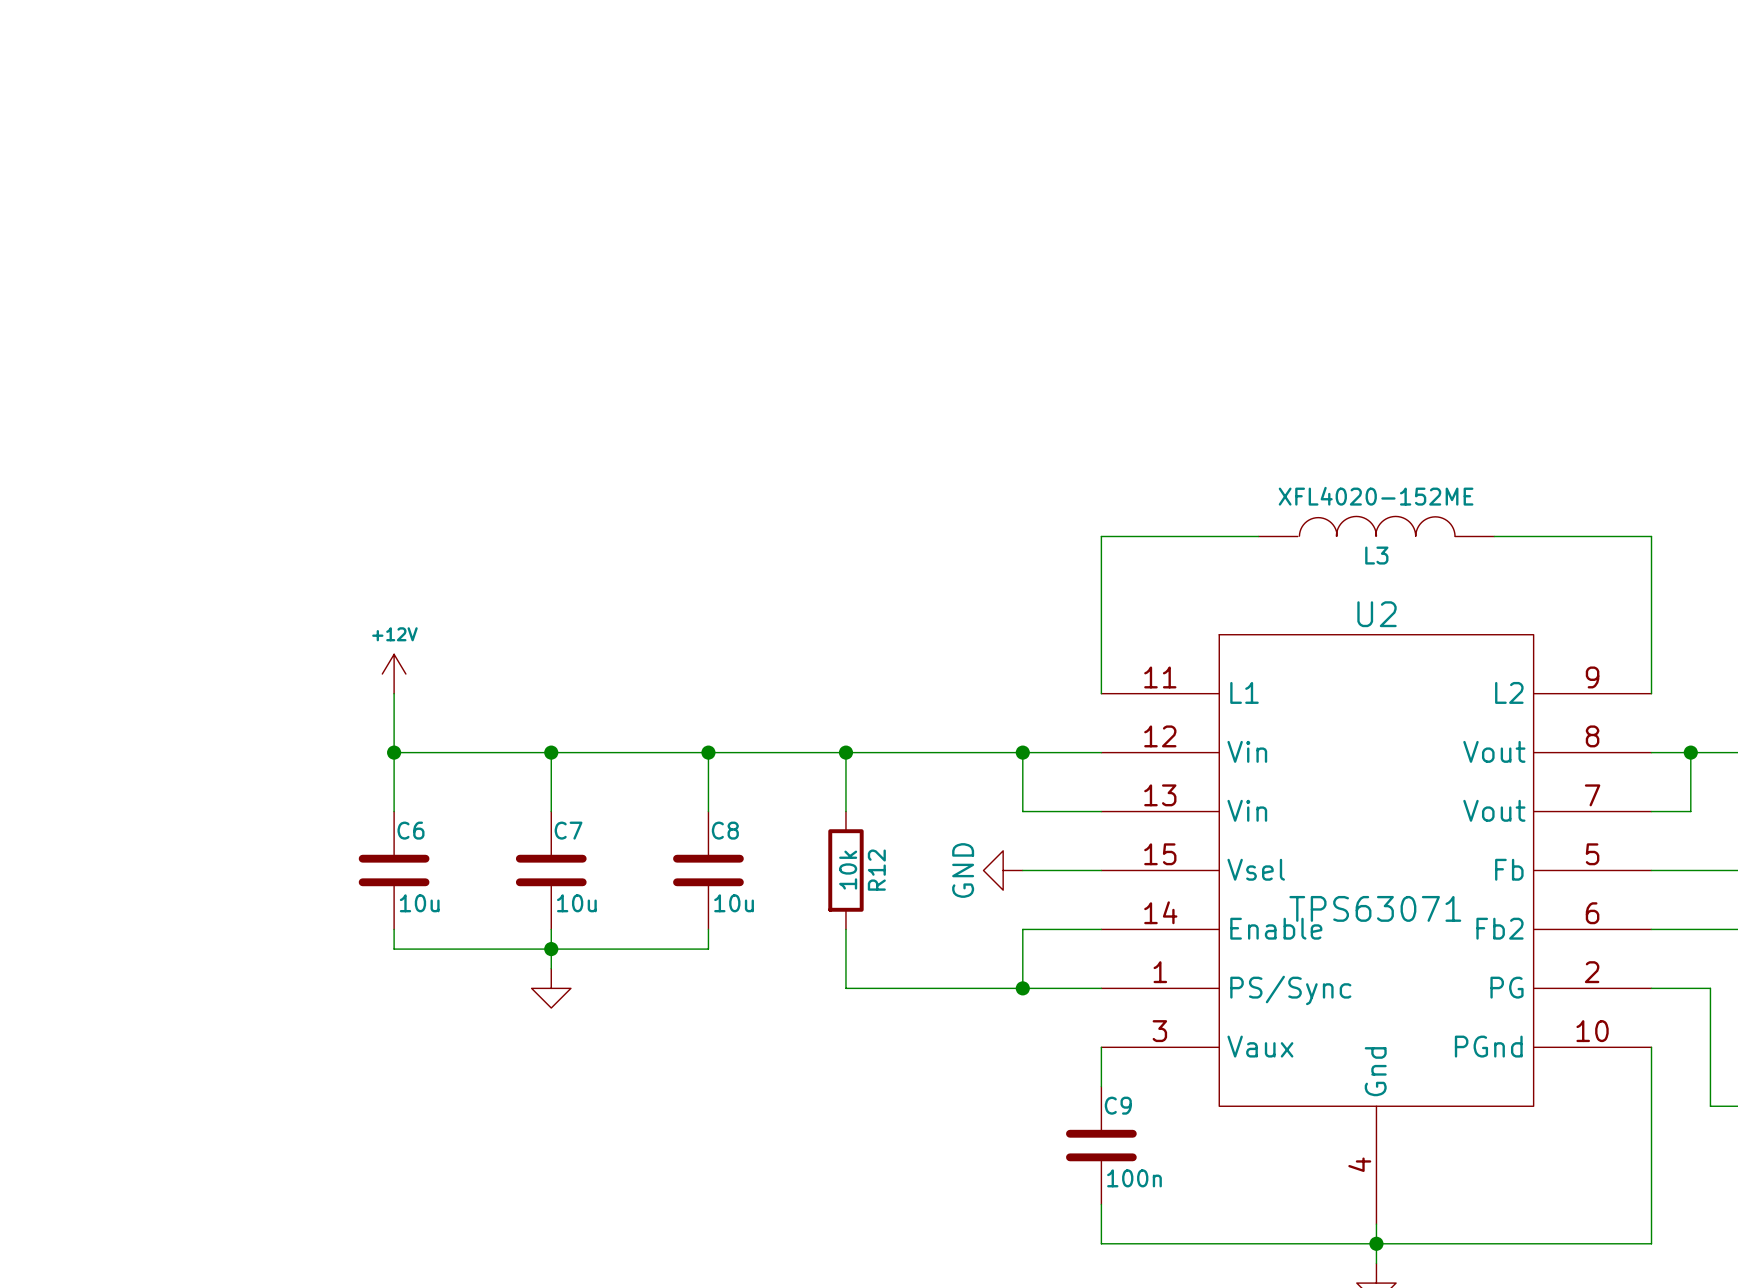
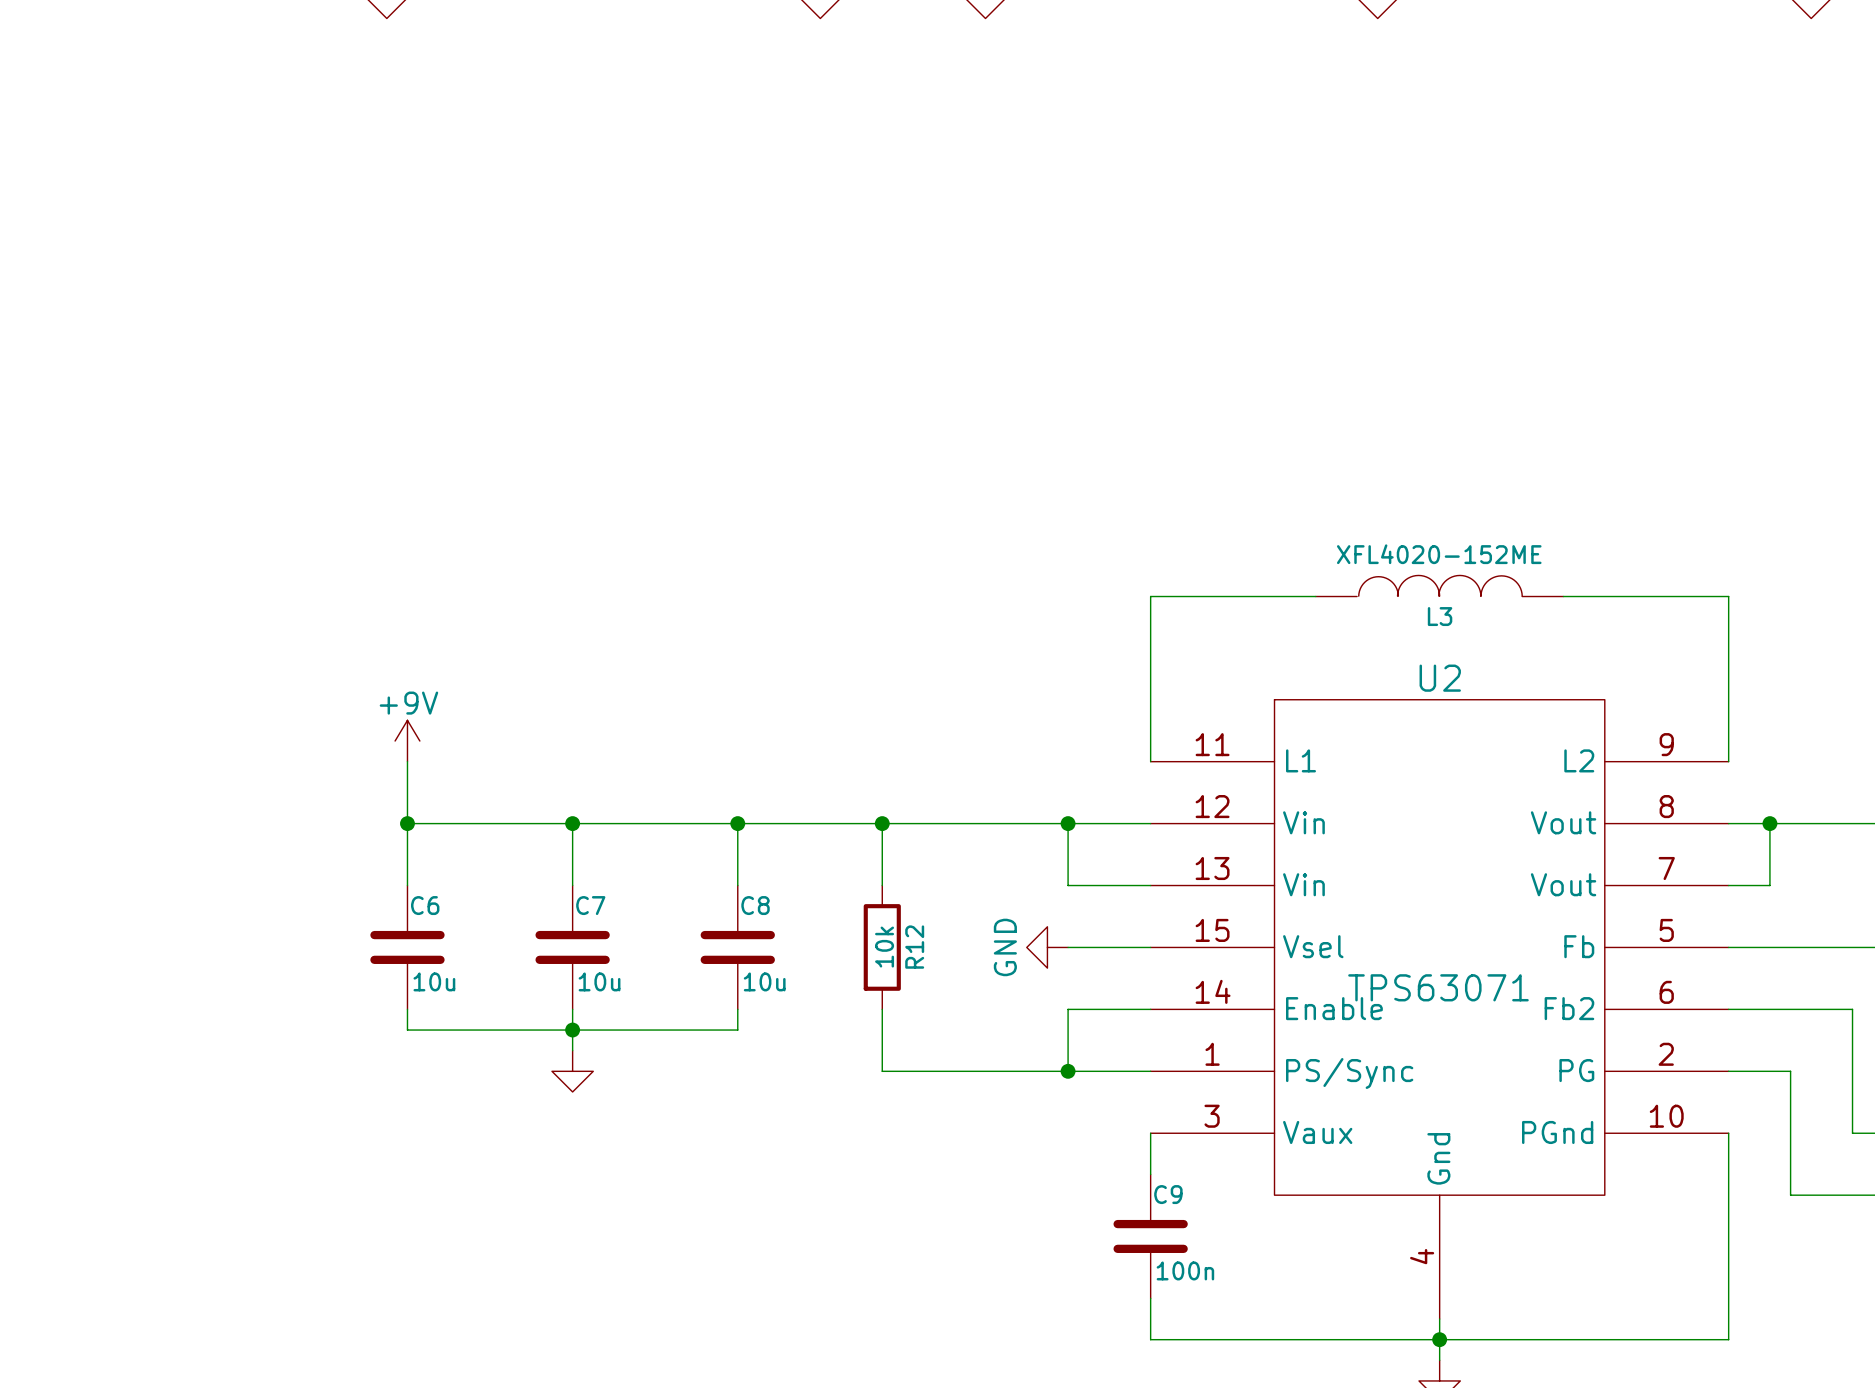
power symbol: +12V (394, 674) -> +9V (407, 741)

